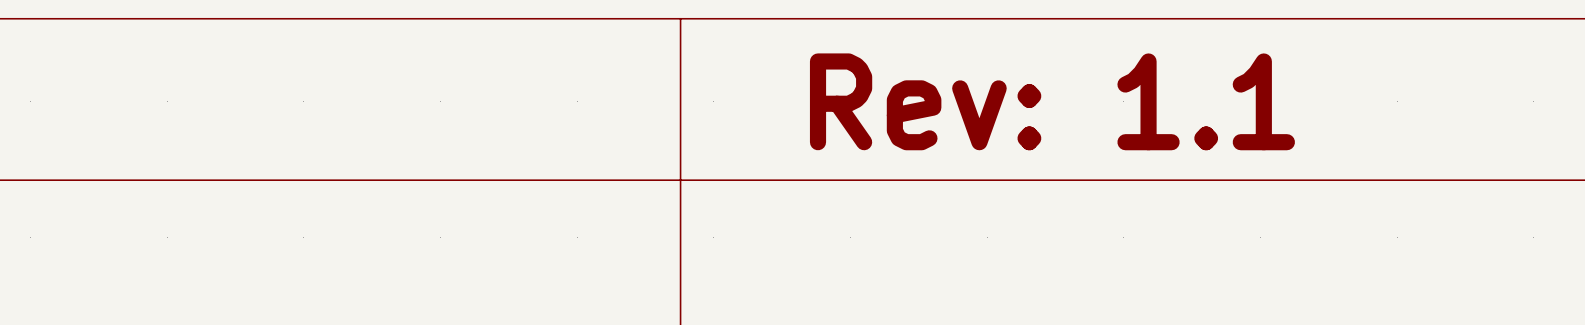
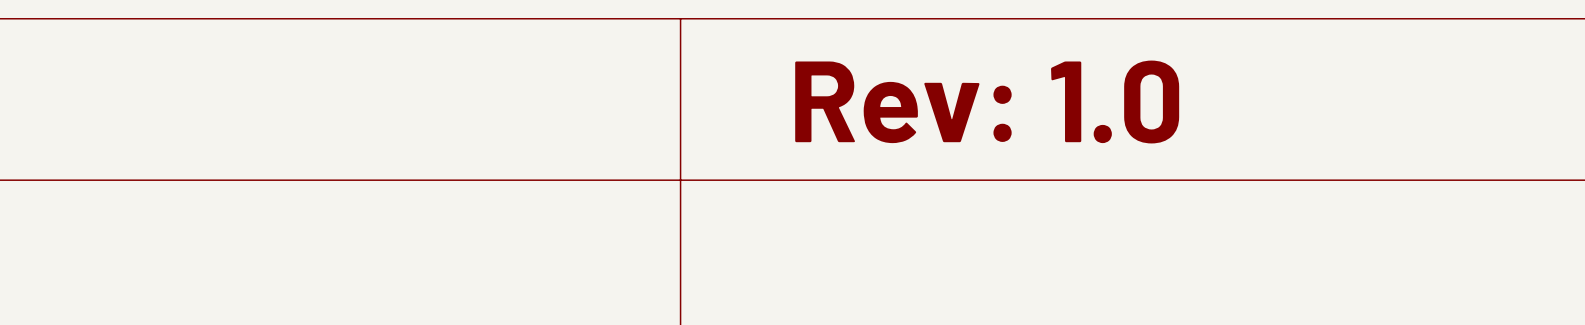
title block: Rev: 1.1 (1052, 101) -> Rev: 1.0 (987, 102)

